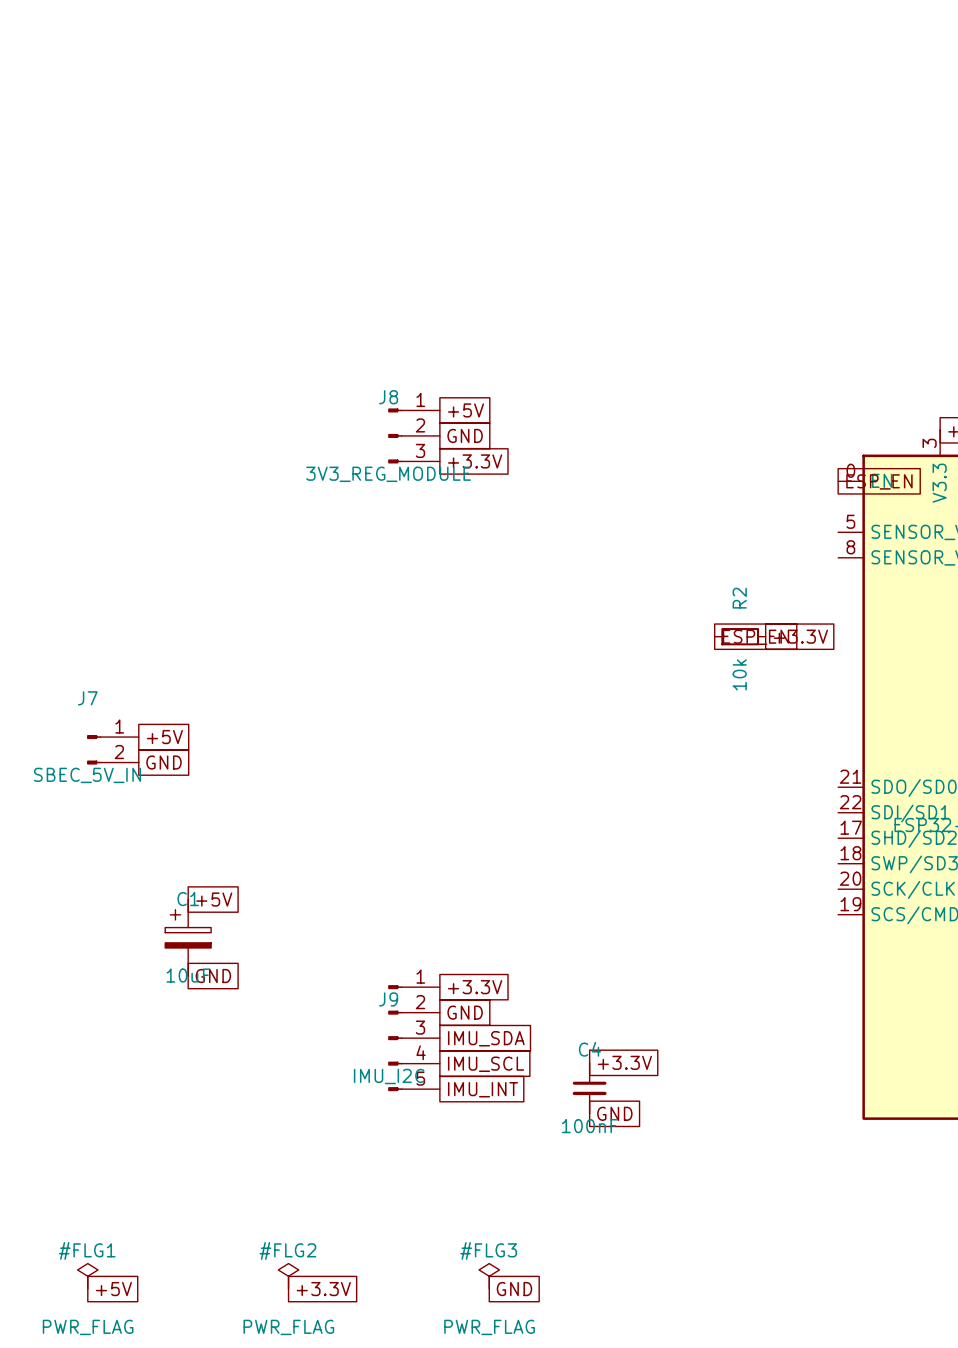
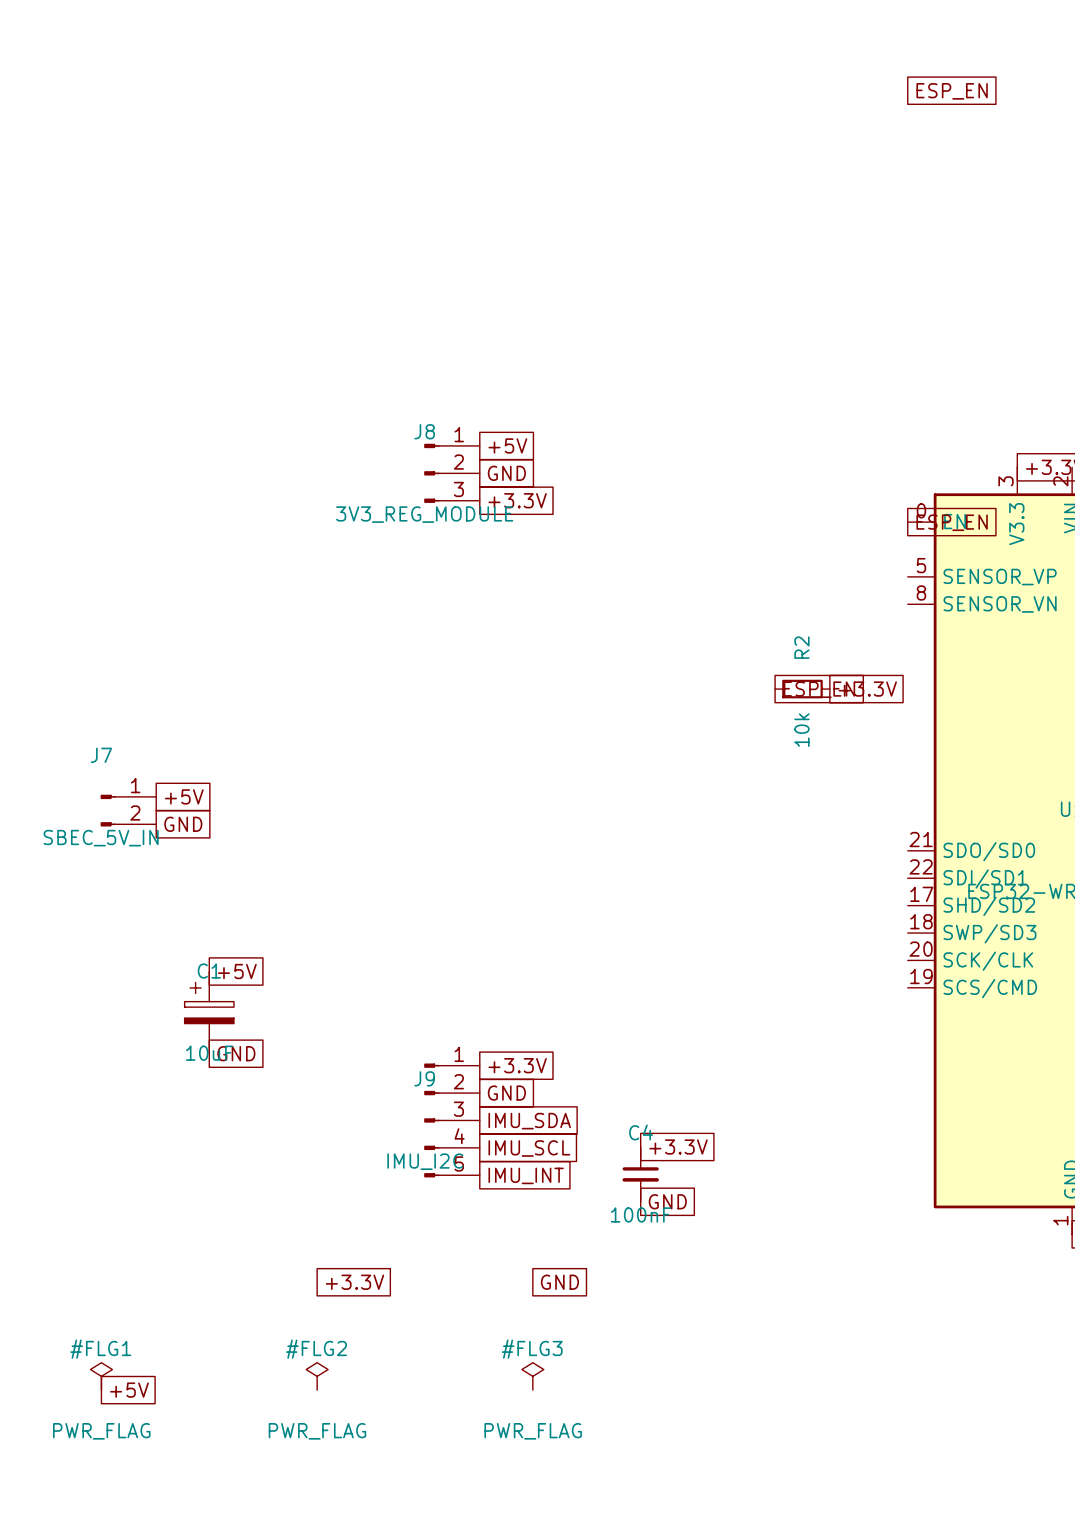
global label: none -> ESP_EN (952, 91)
global label position: +3.3V (323, 1289) -> +3.3V (354, 1282)
global label position: GND (514, 1289) -> GND (559, 1282)

